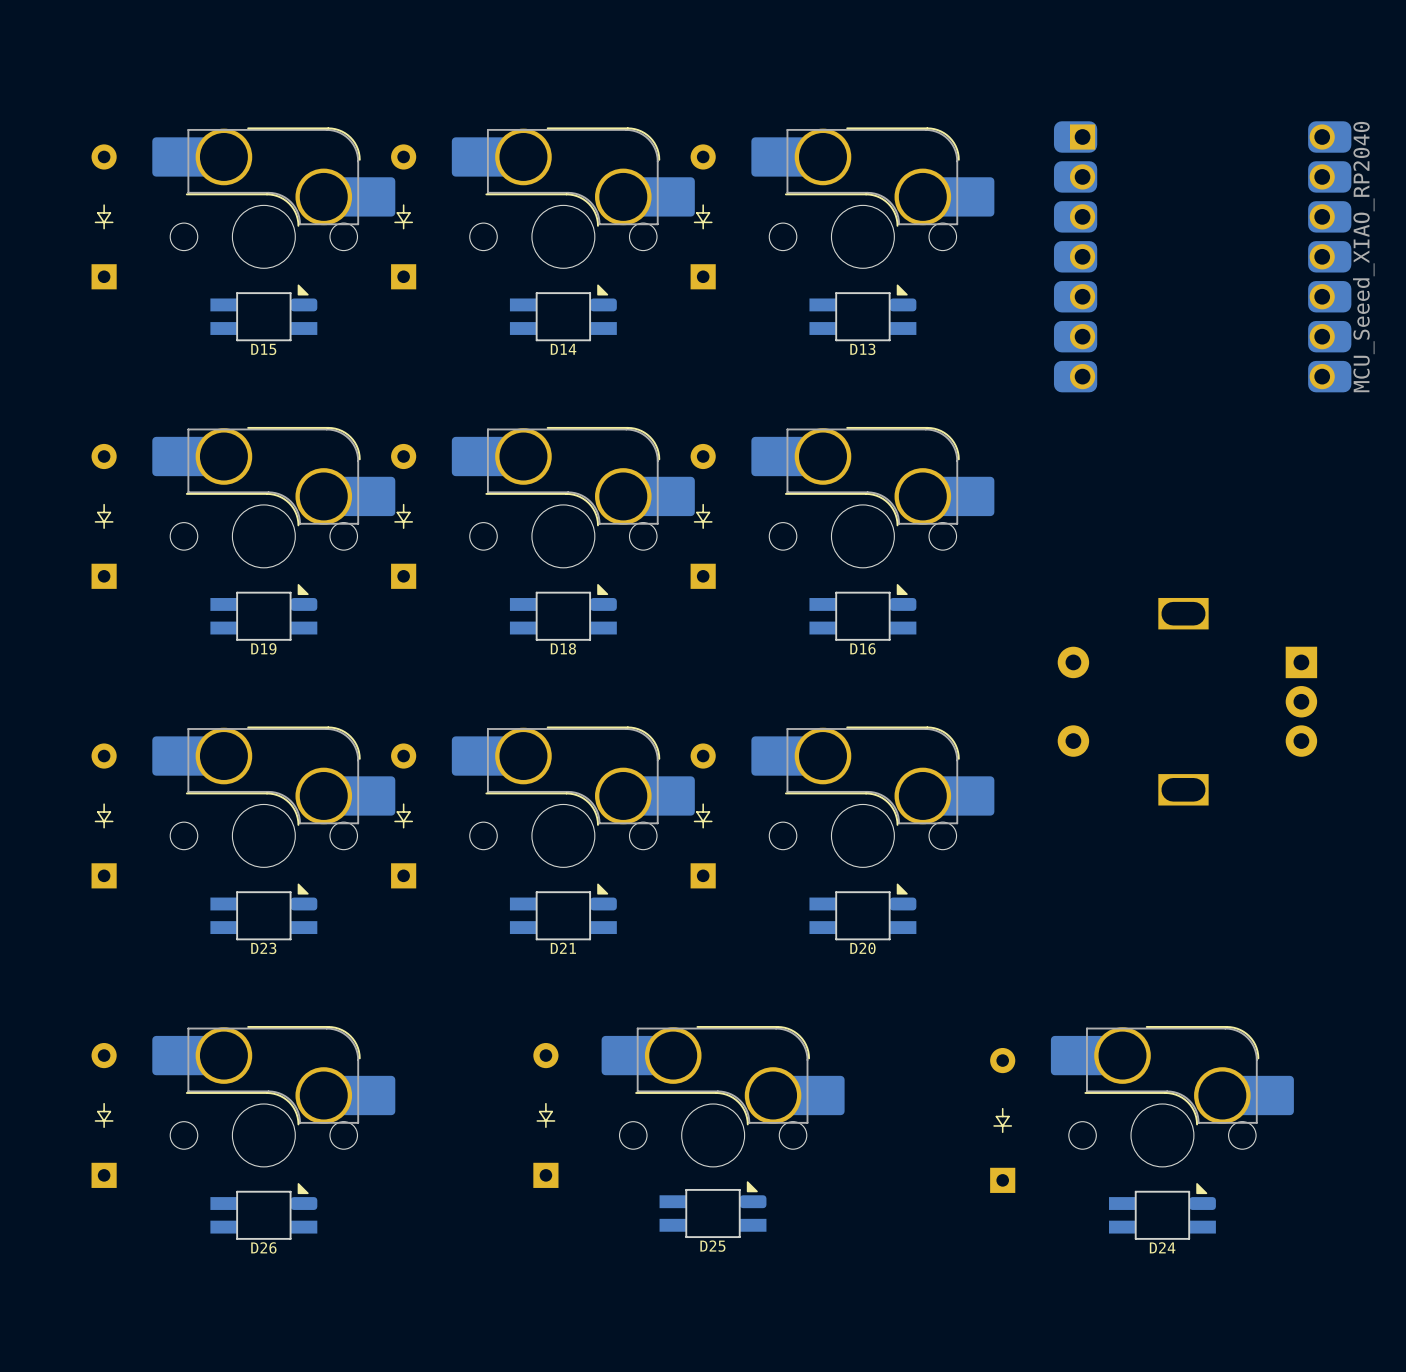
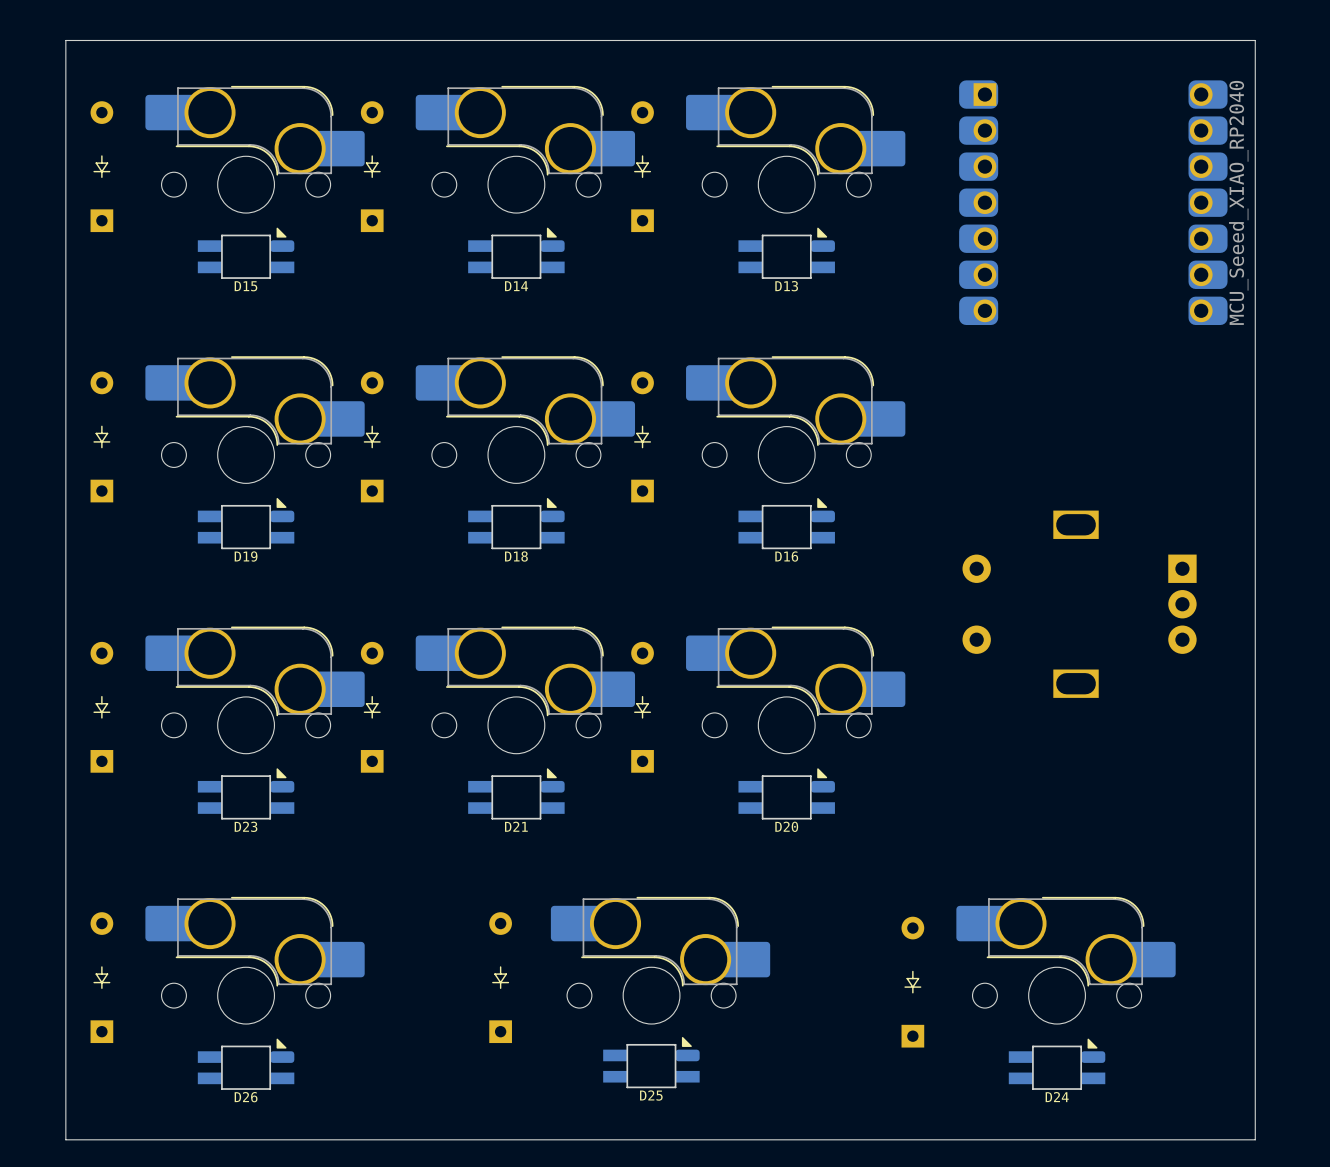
board edge: none -> (1255, 40) (65, 40) (65, 1139) (1255, 1139) (1255, 40)

